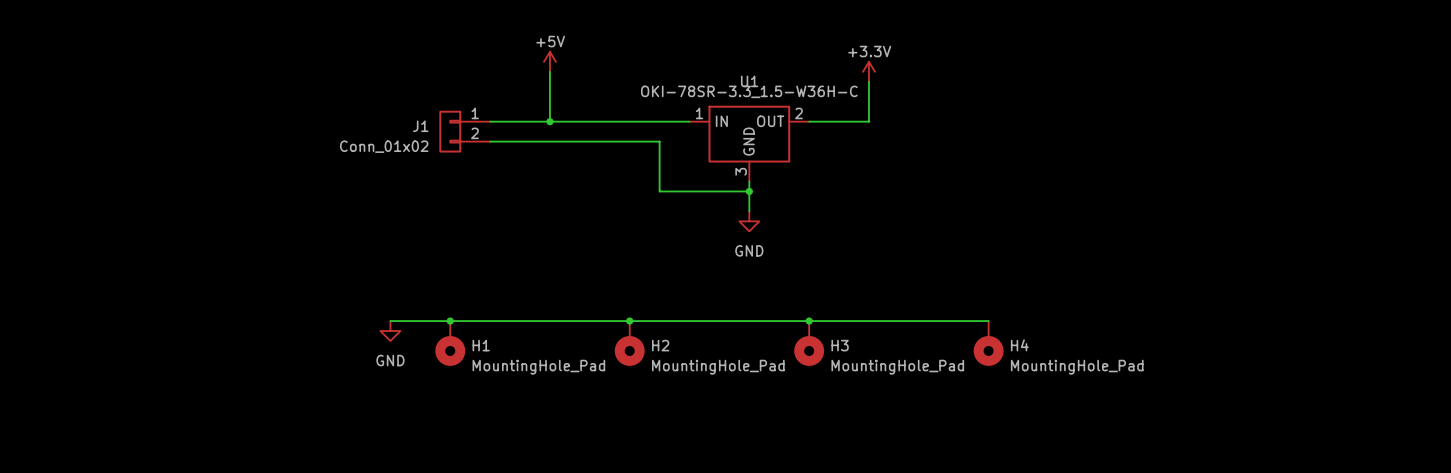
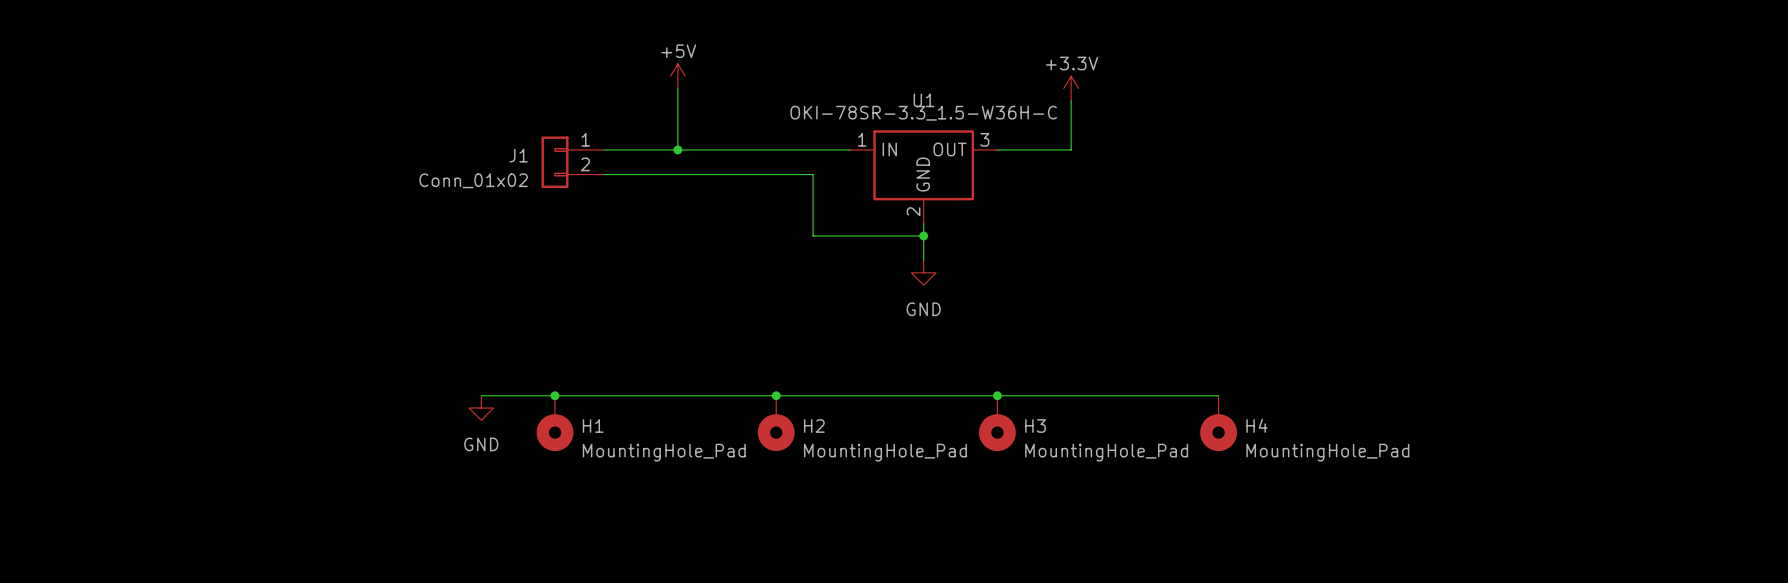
U1 pin number: 2 (798, 113) -> 3 (984, 139)
U1 pin number: 3 (741, 171) -> 2 (913, 211)

